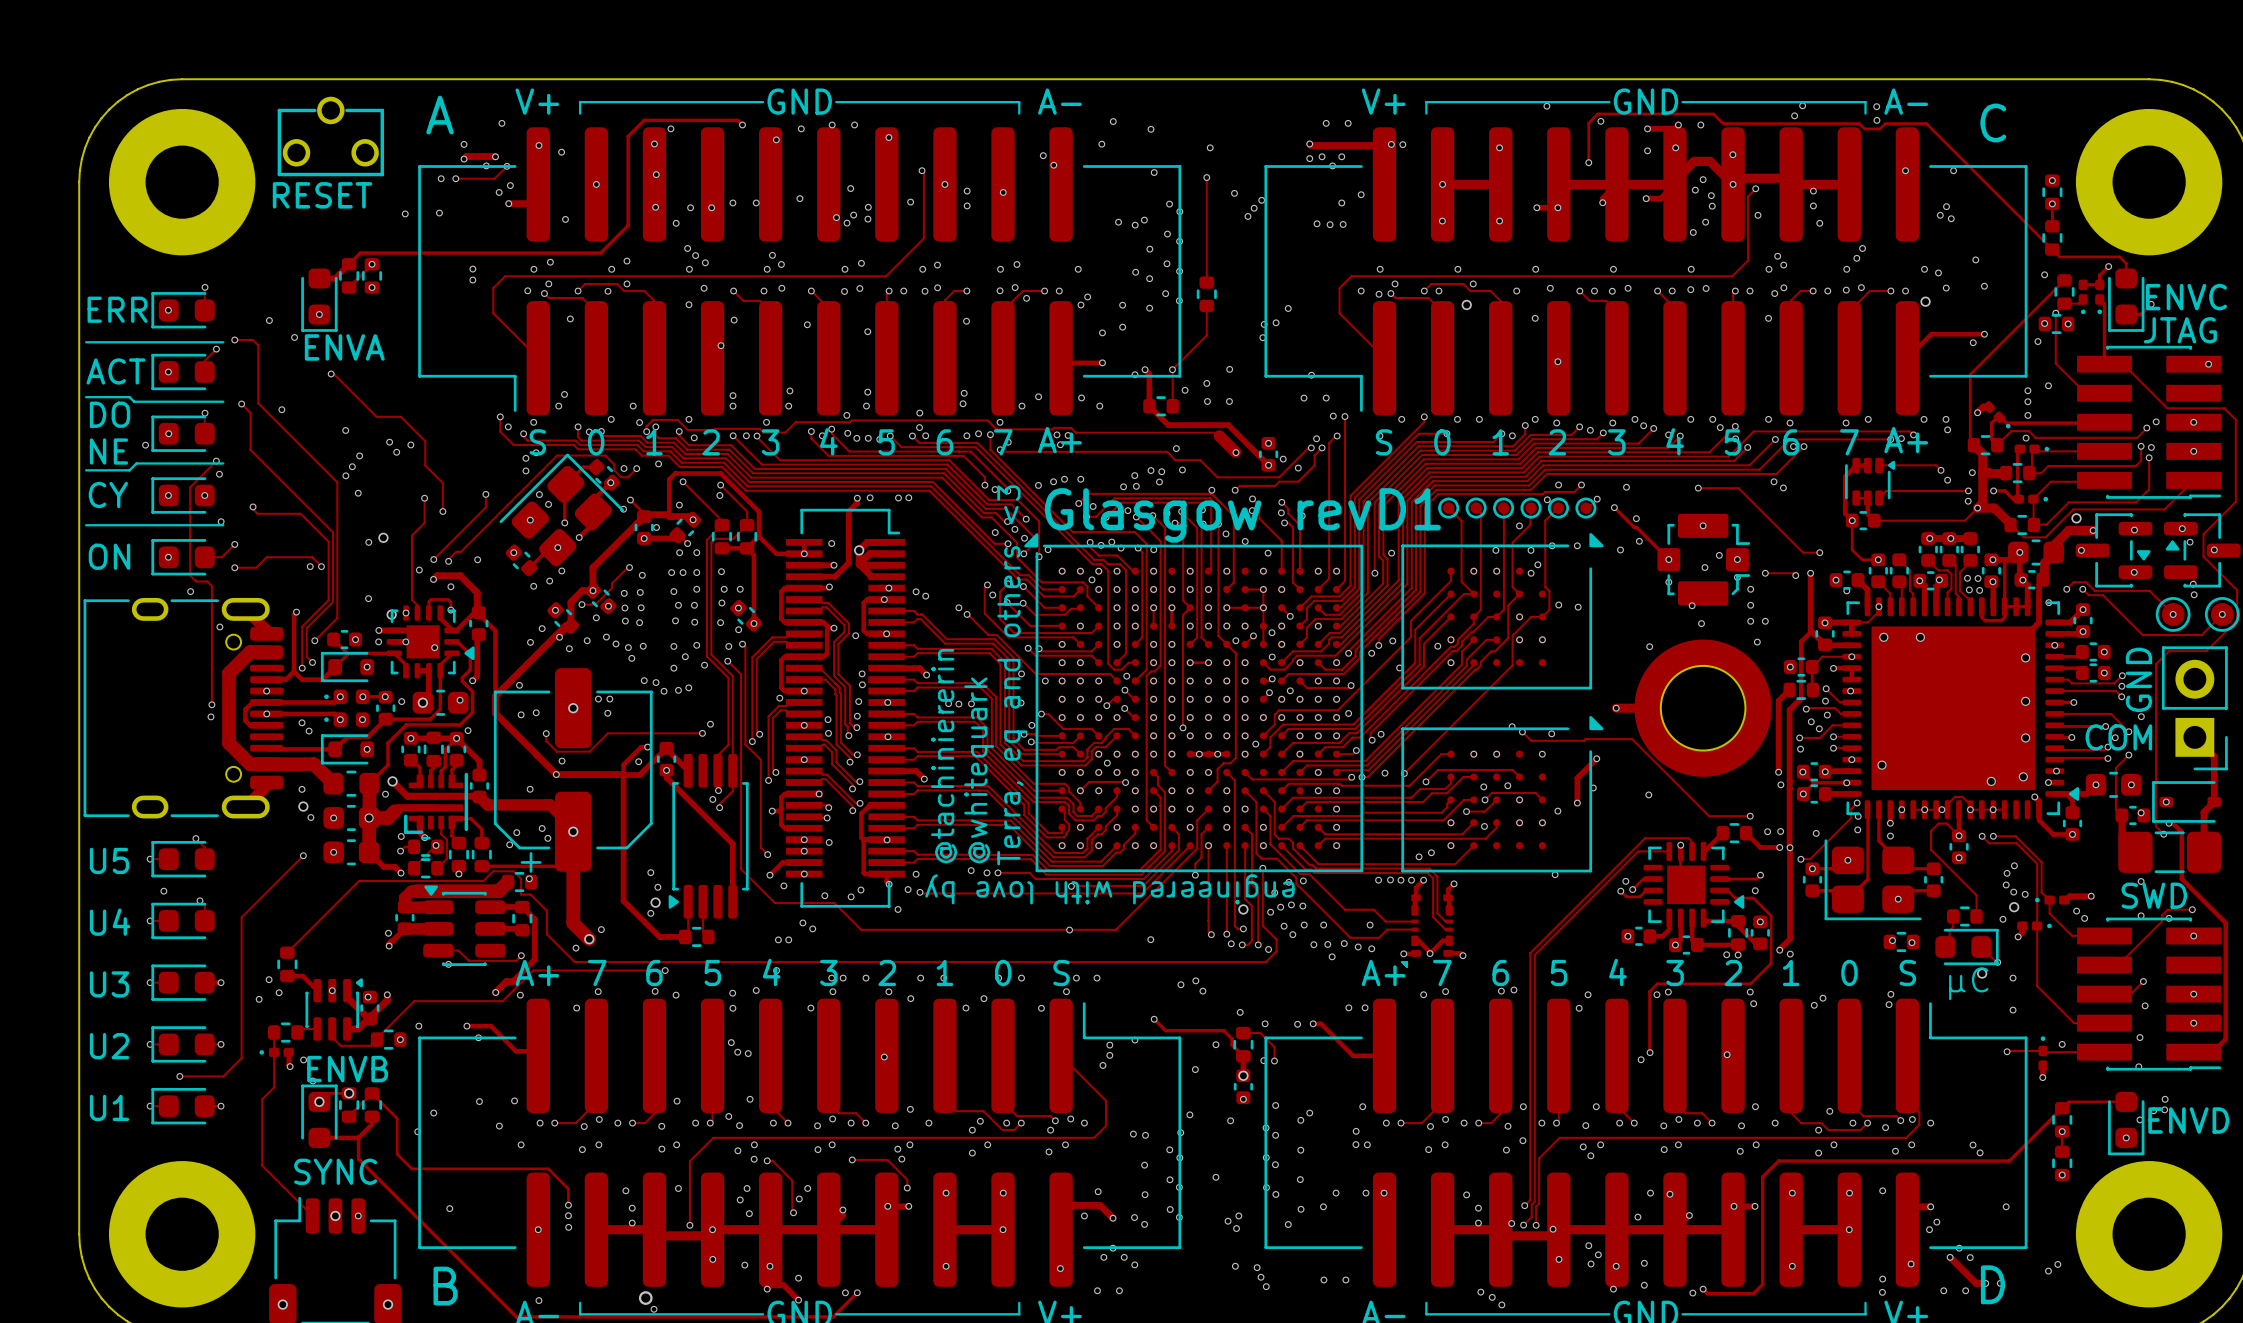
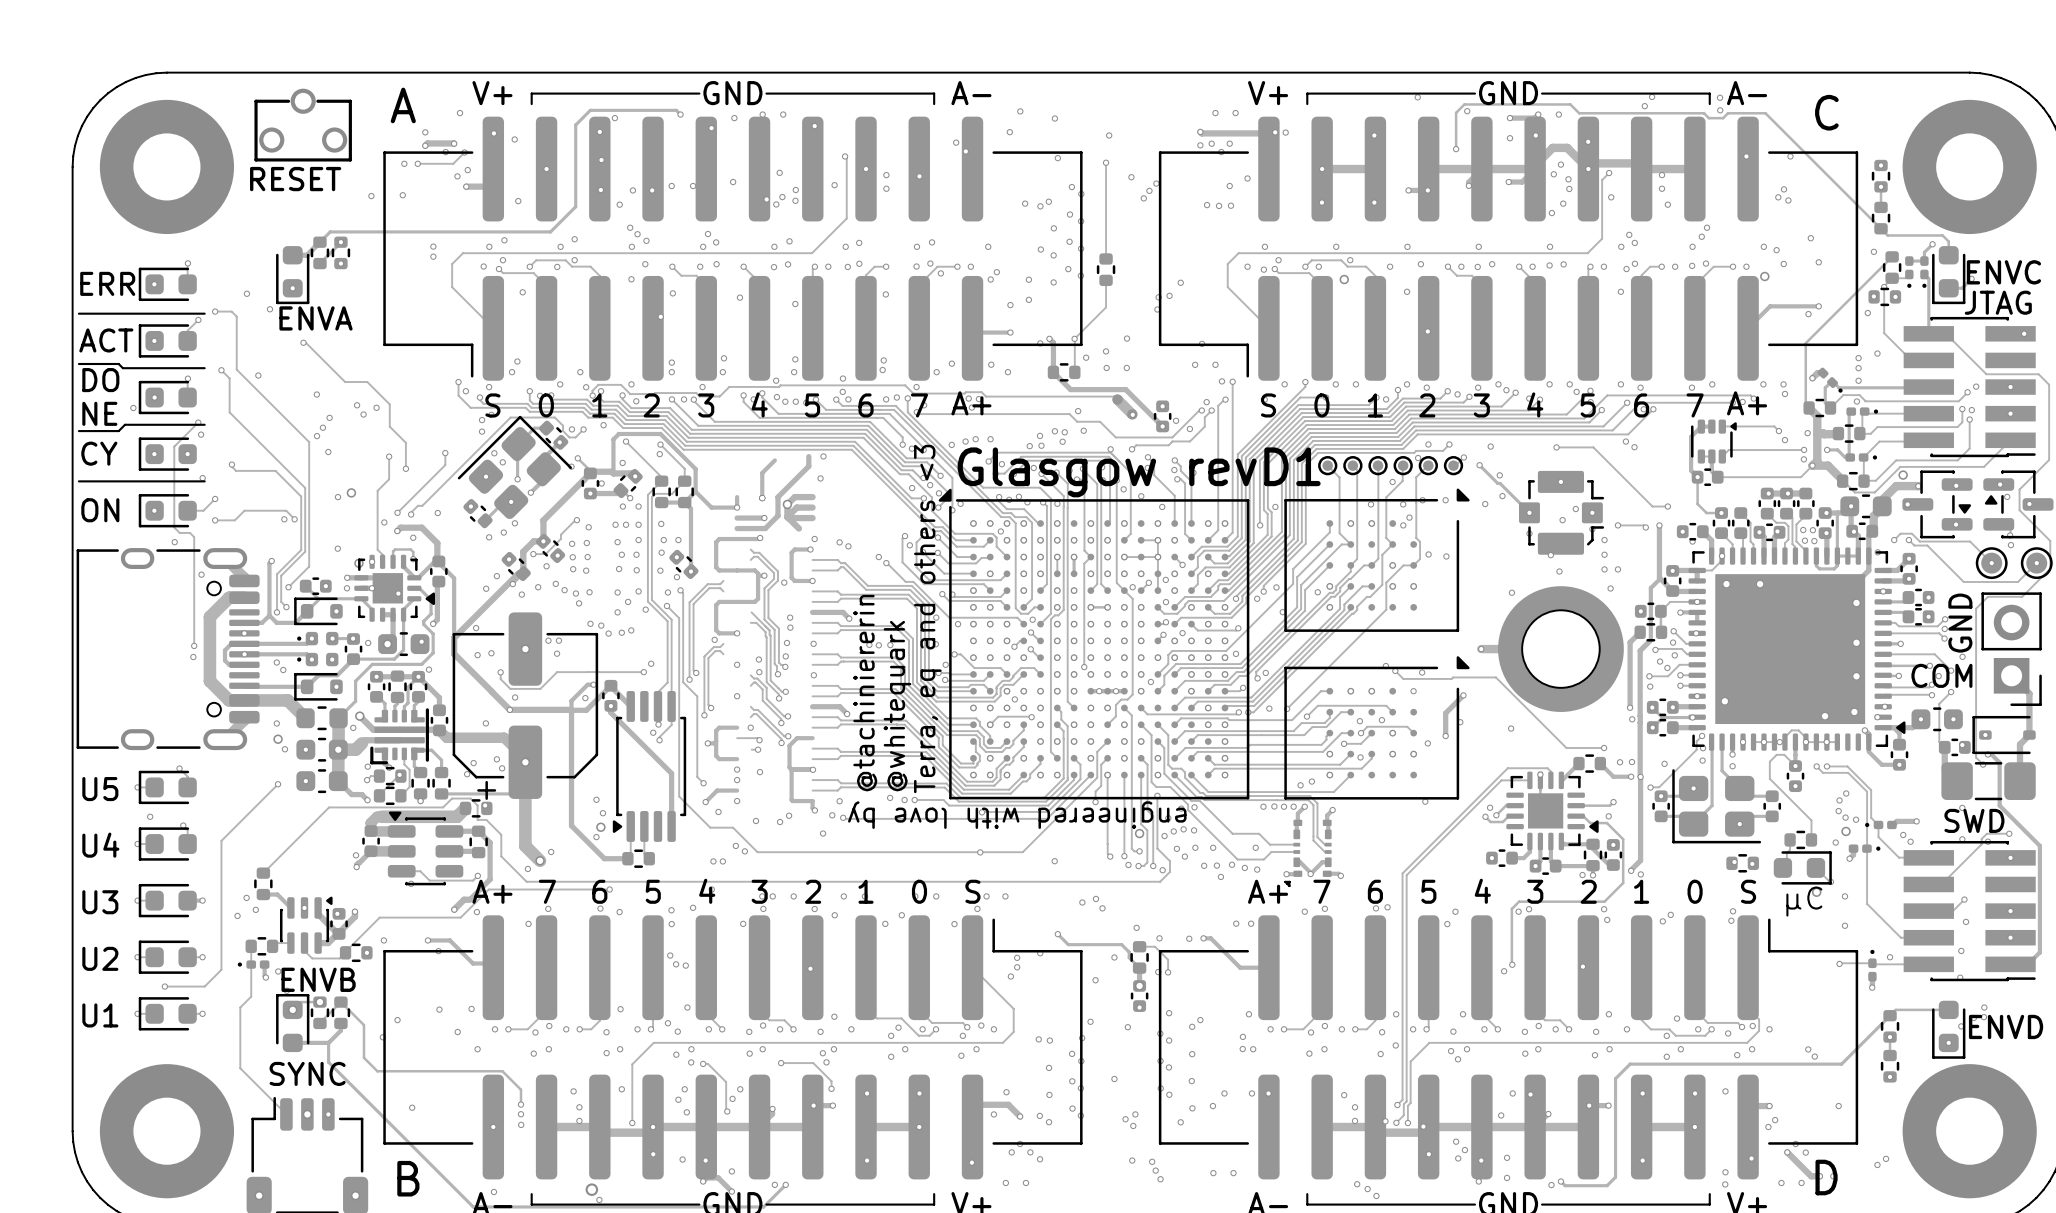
via: (870, 497) -> none
via: (908, 497) -> none
track: (857, 498) (857, 503) (848, 511) (848, 542) -> (808, 456) (808, 466) (777, 497)
via: (857, 498) -> none
track: none -> (774, 460) (762, 472) (762, 498)
via: none -> (820, 478)
part: (845, 708) -> none
track: (799, 903) (834, 903) (861, 929) -> (733, 827) (757, 852) (789, 852)

